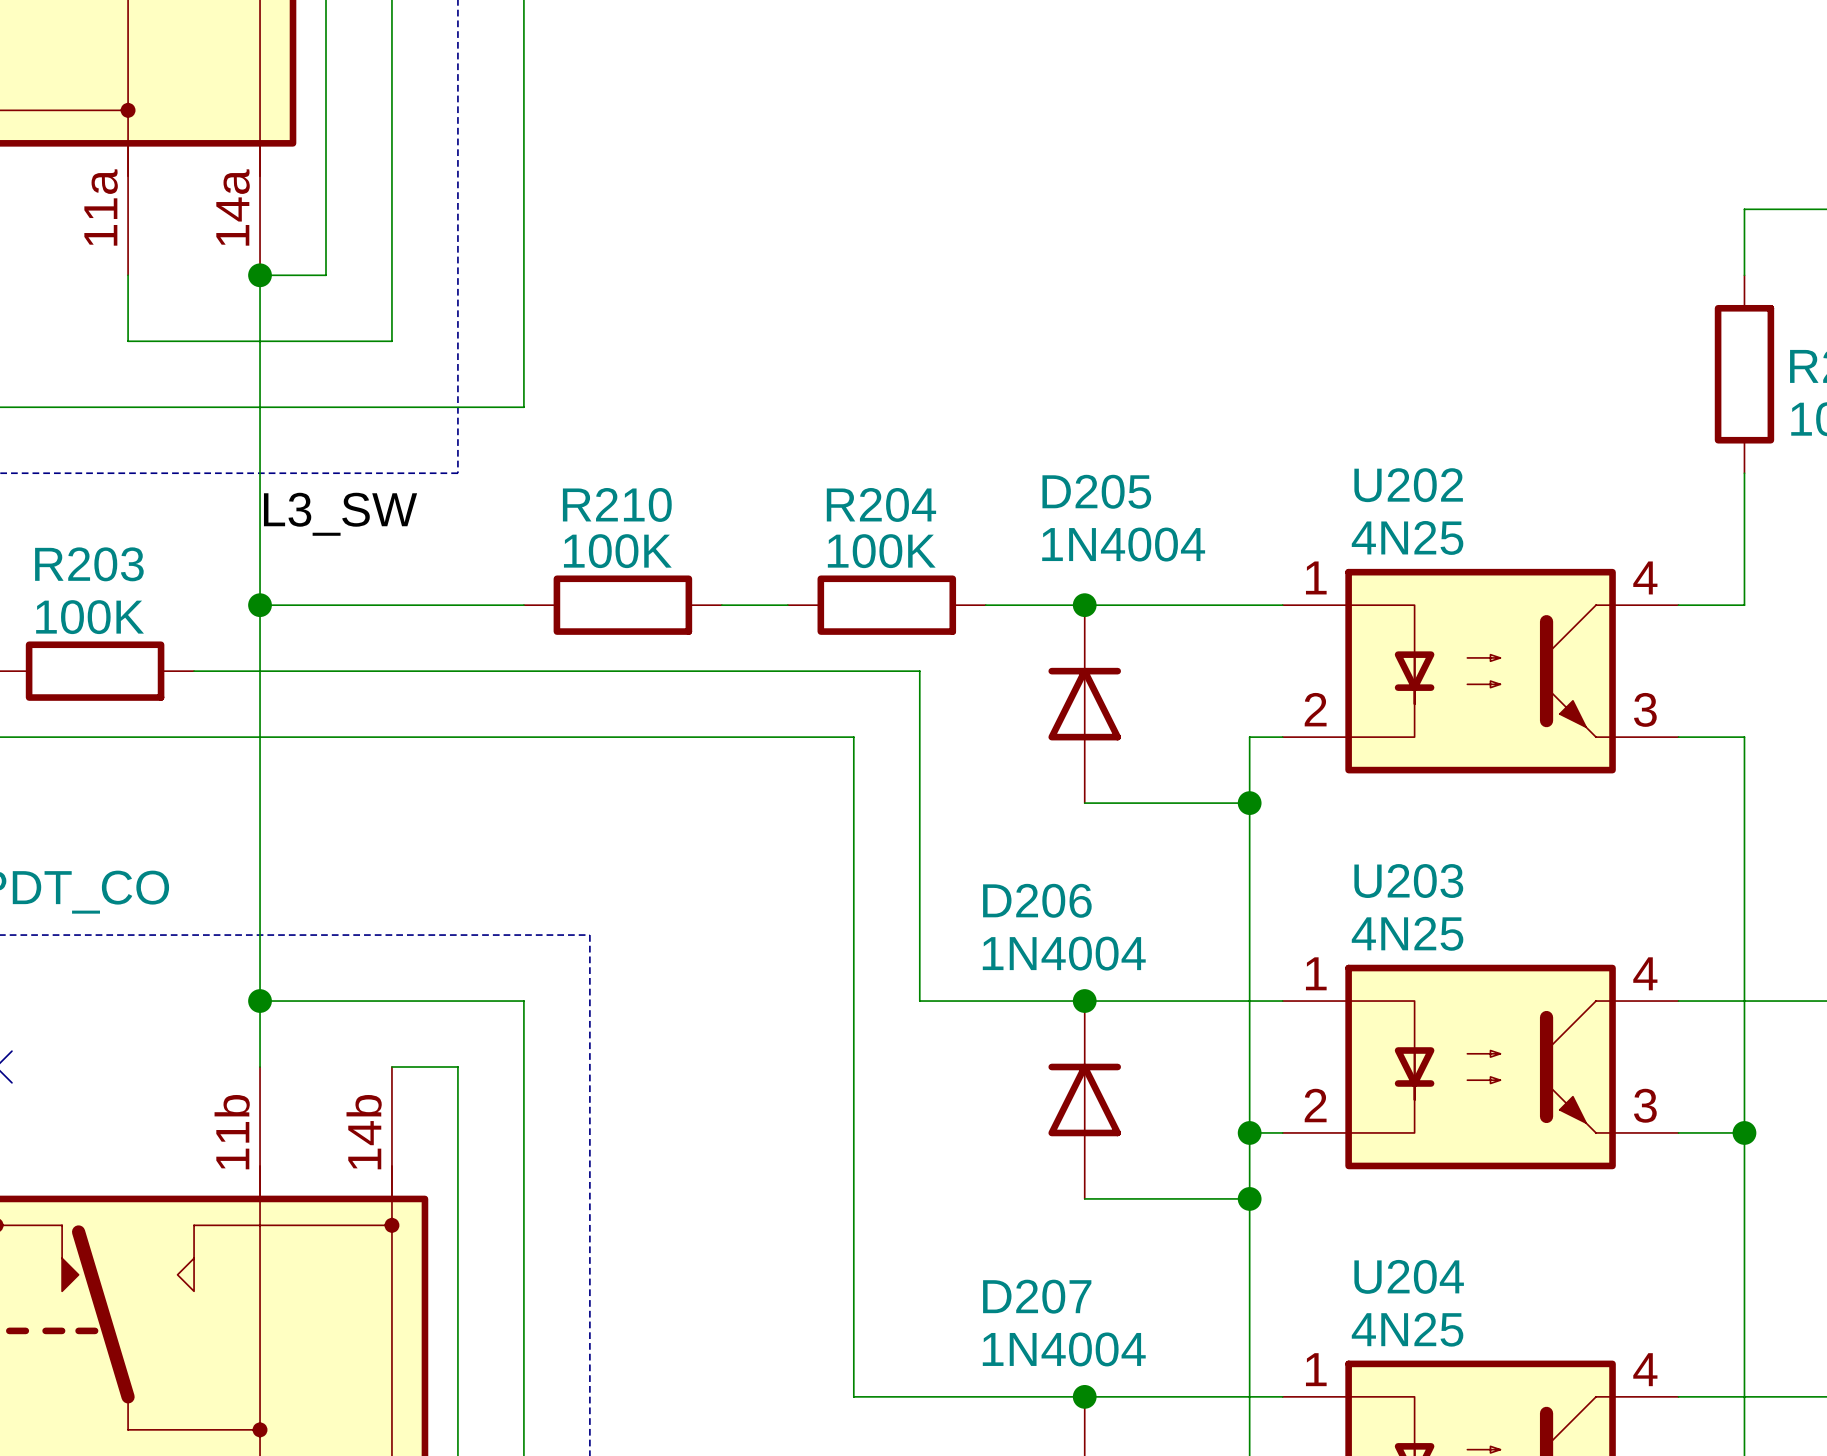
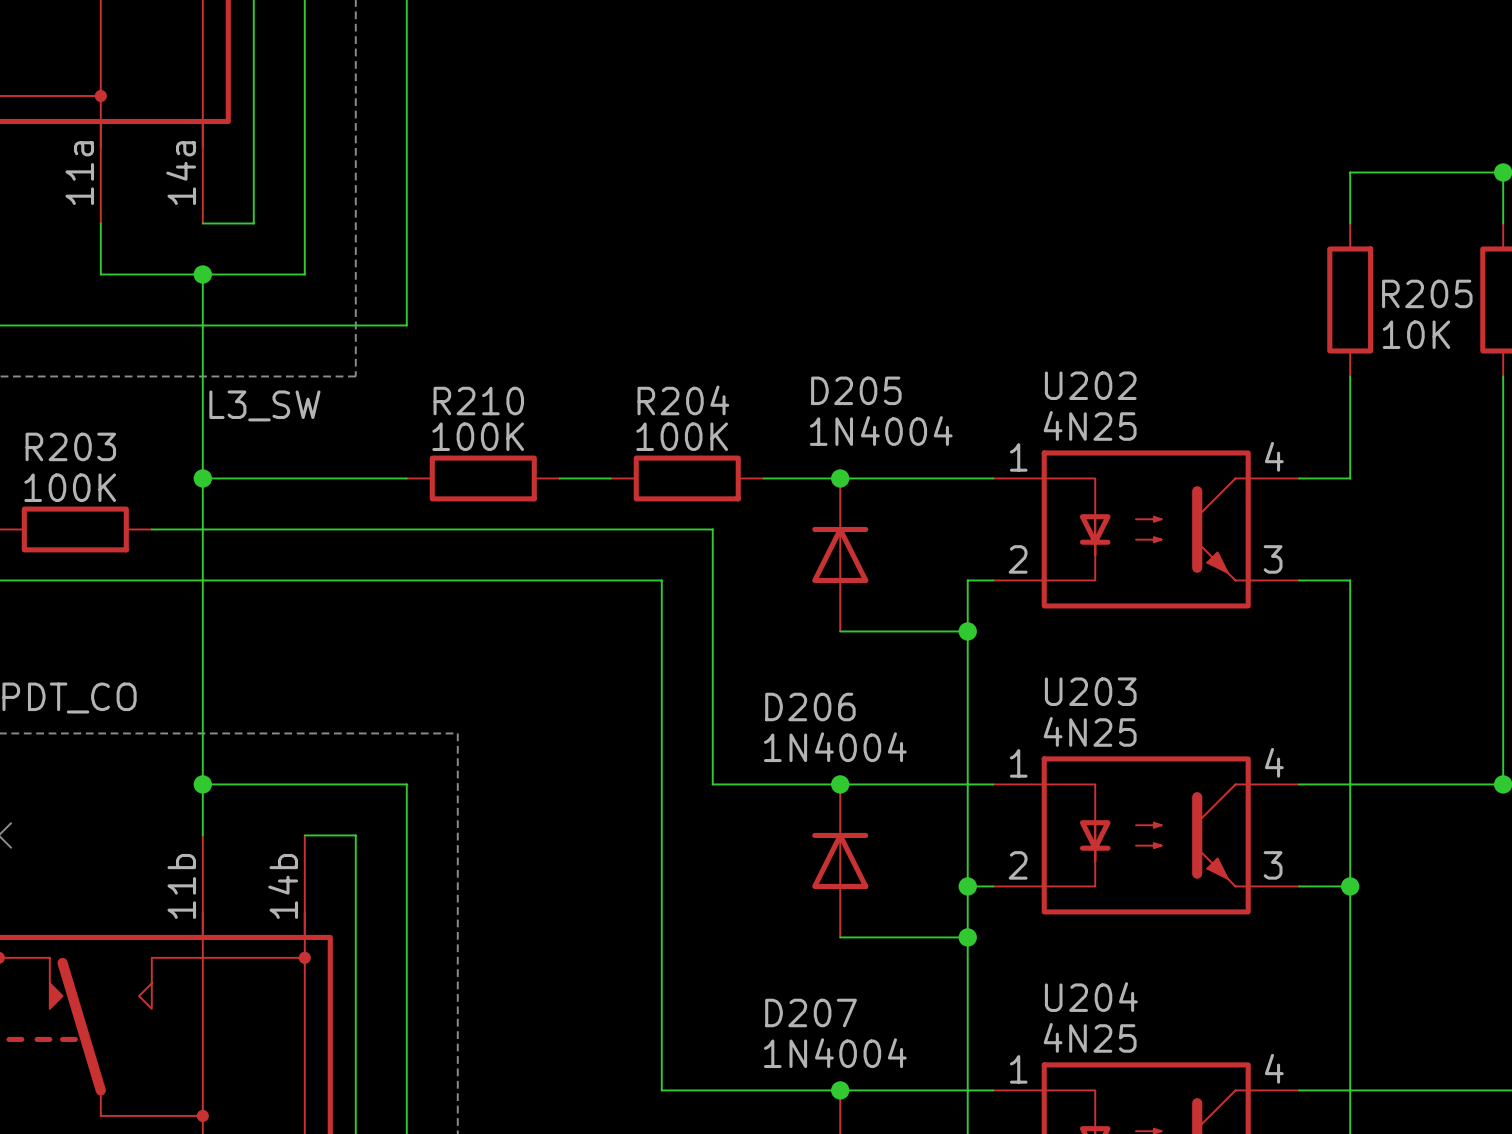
wire: (260, 275) (260, 341) -> none
junction position: (260, 275) -> (202, 274)

